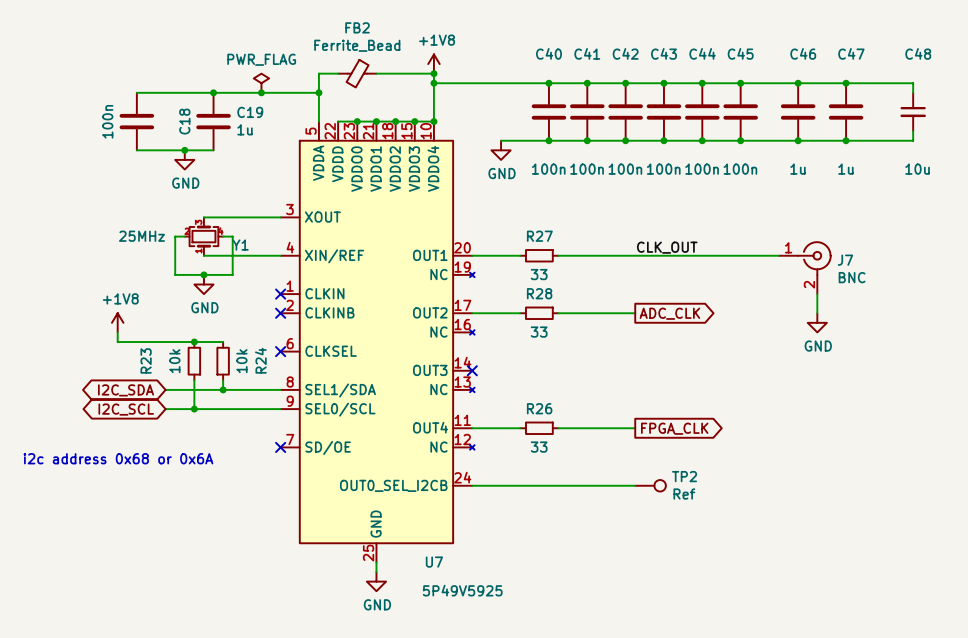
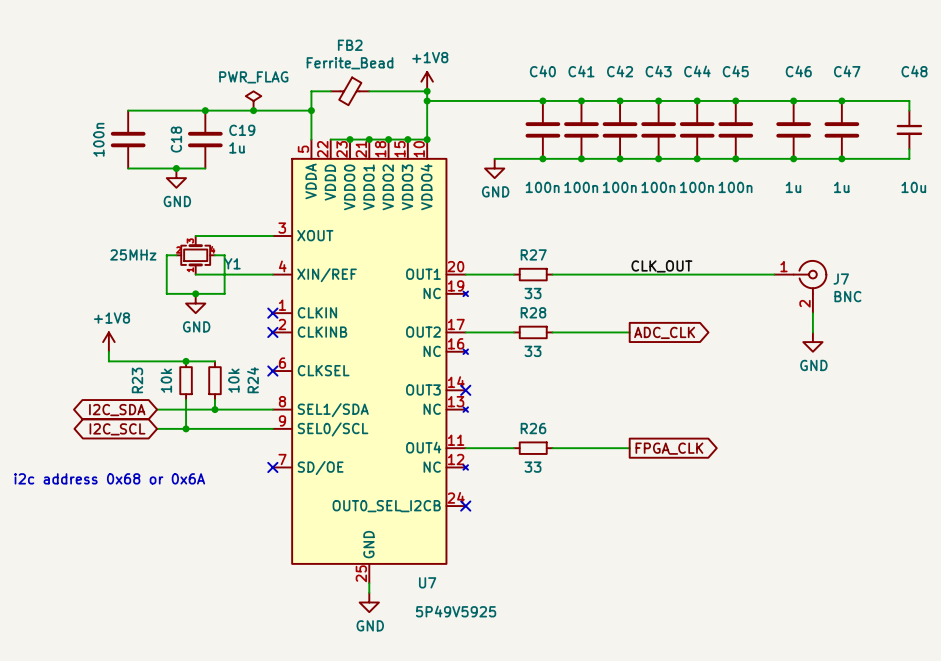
wire: (472, 485) (635, 485) -> none
no-connect mark: none -> (465, 506)
TP2: Ref (650, 485) -> none

